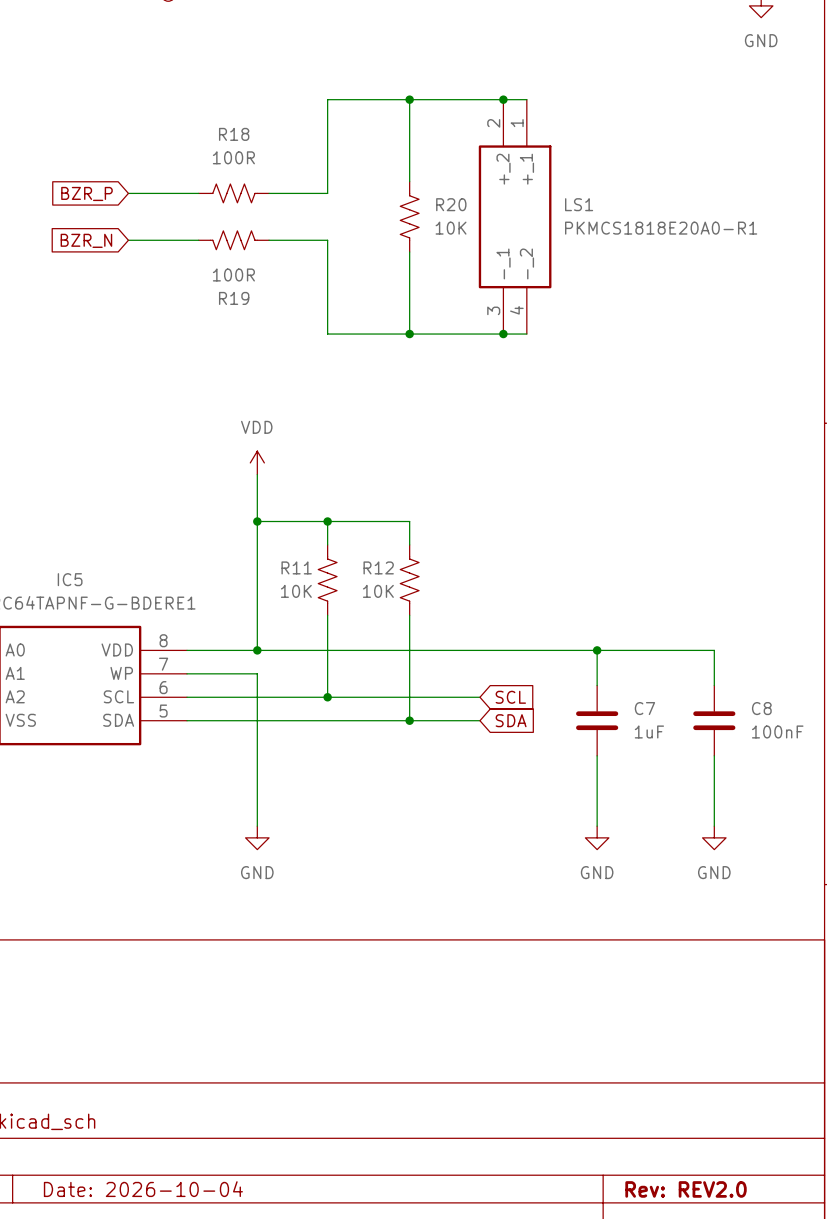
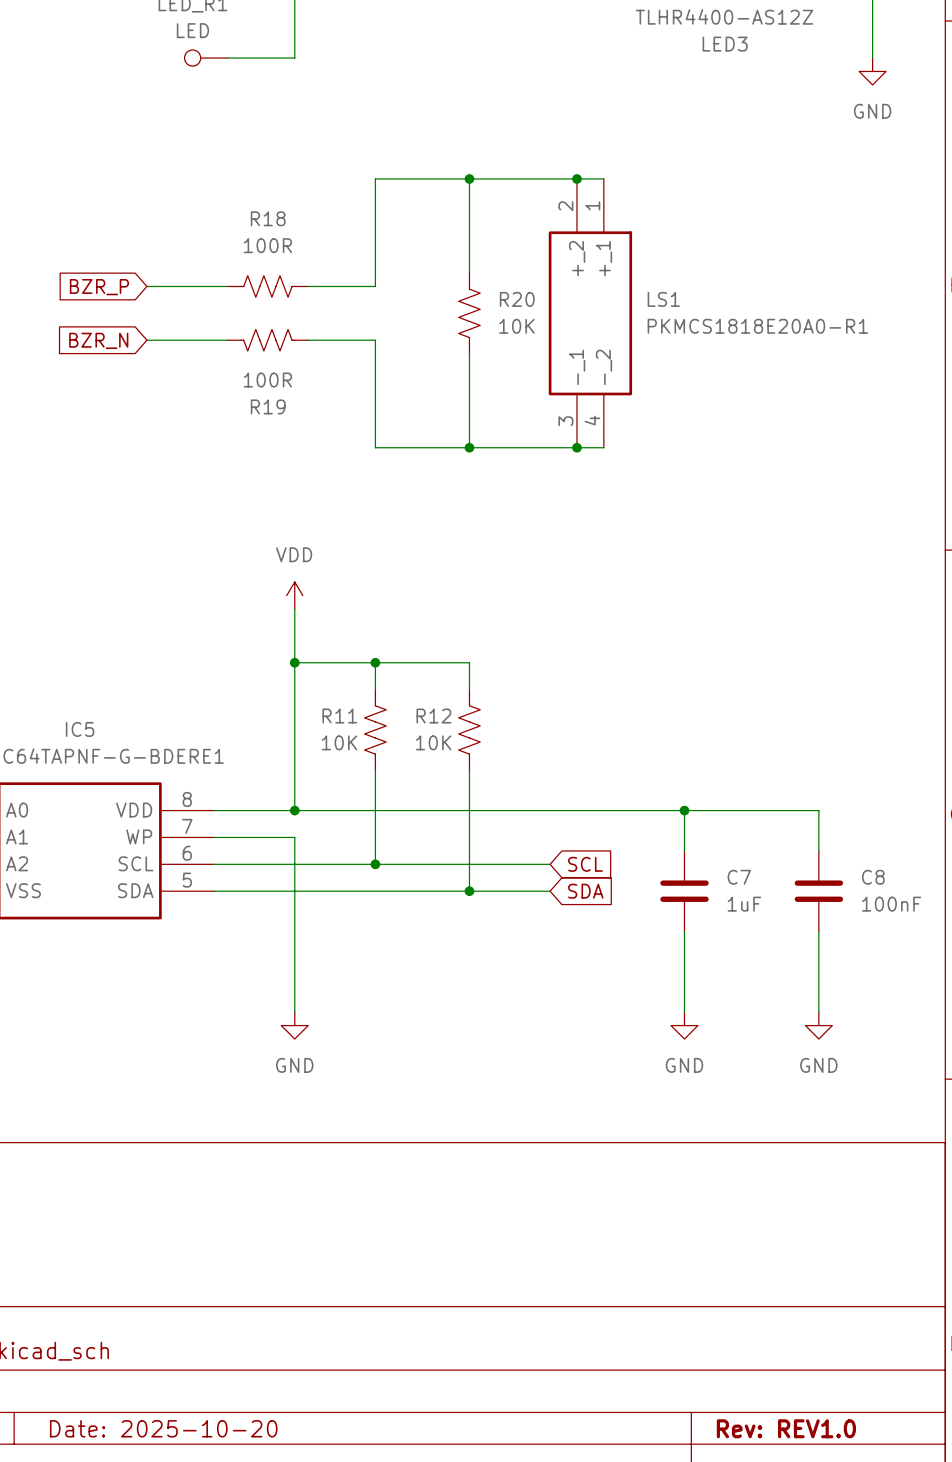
title block: Date: 2026-10-04 (143, 1189) -> Date: 2025-10-20 (163, 1428)
title block: Rev: REV2.0 (686, 1189) -> Rev: REV1.0 (786, 1428)

